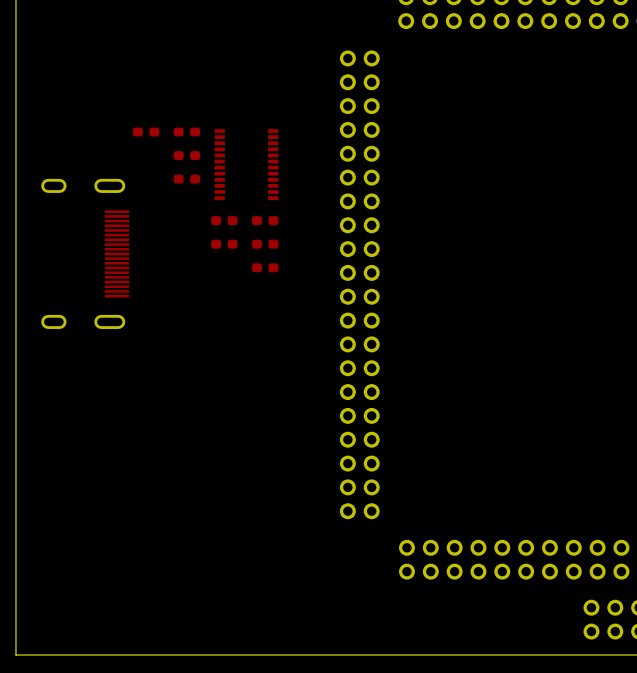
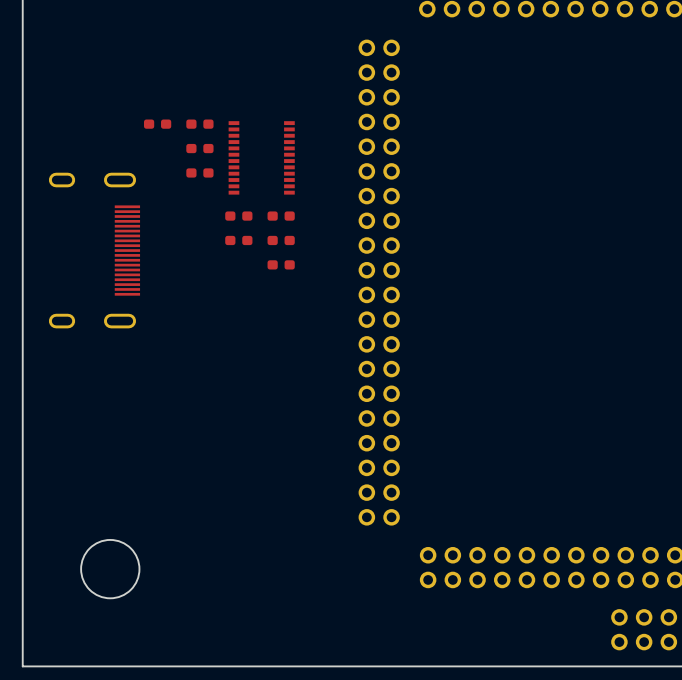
round board edge: none -> [80, 539, 141, 599]

